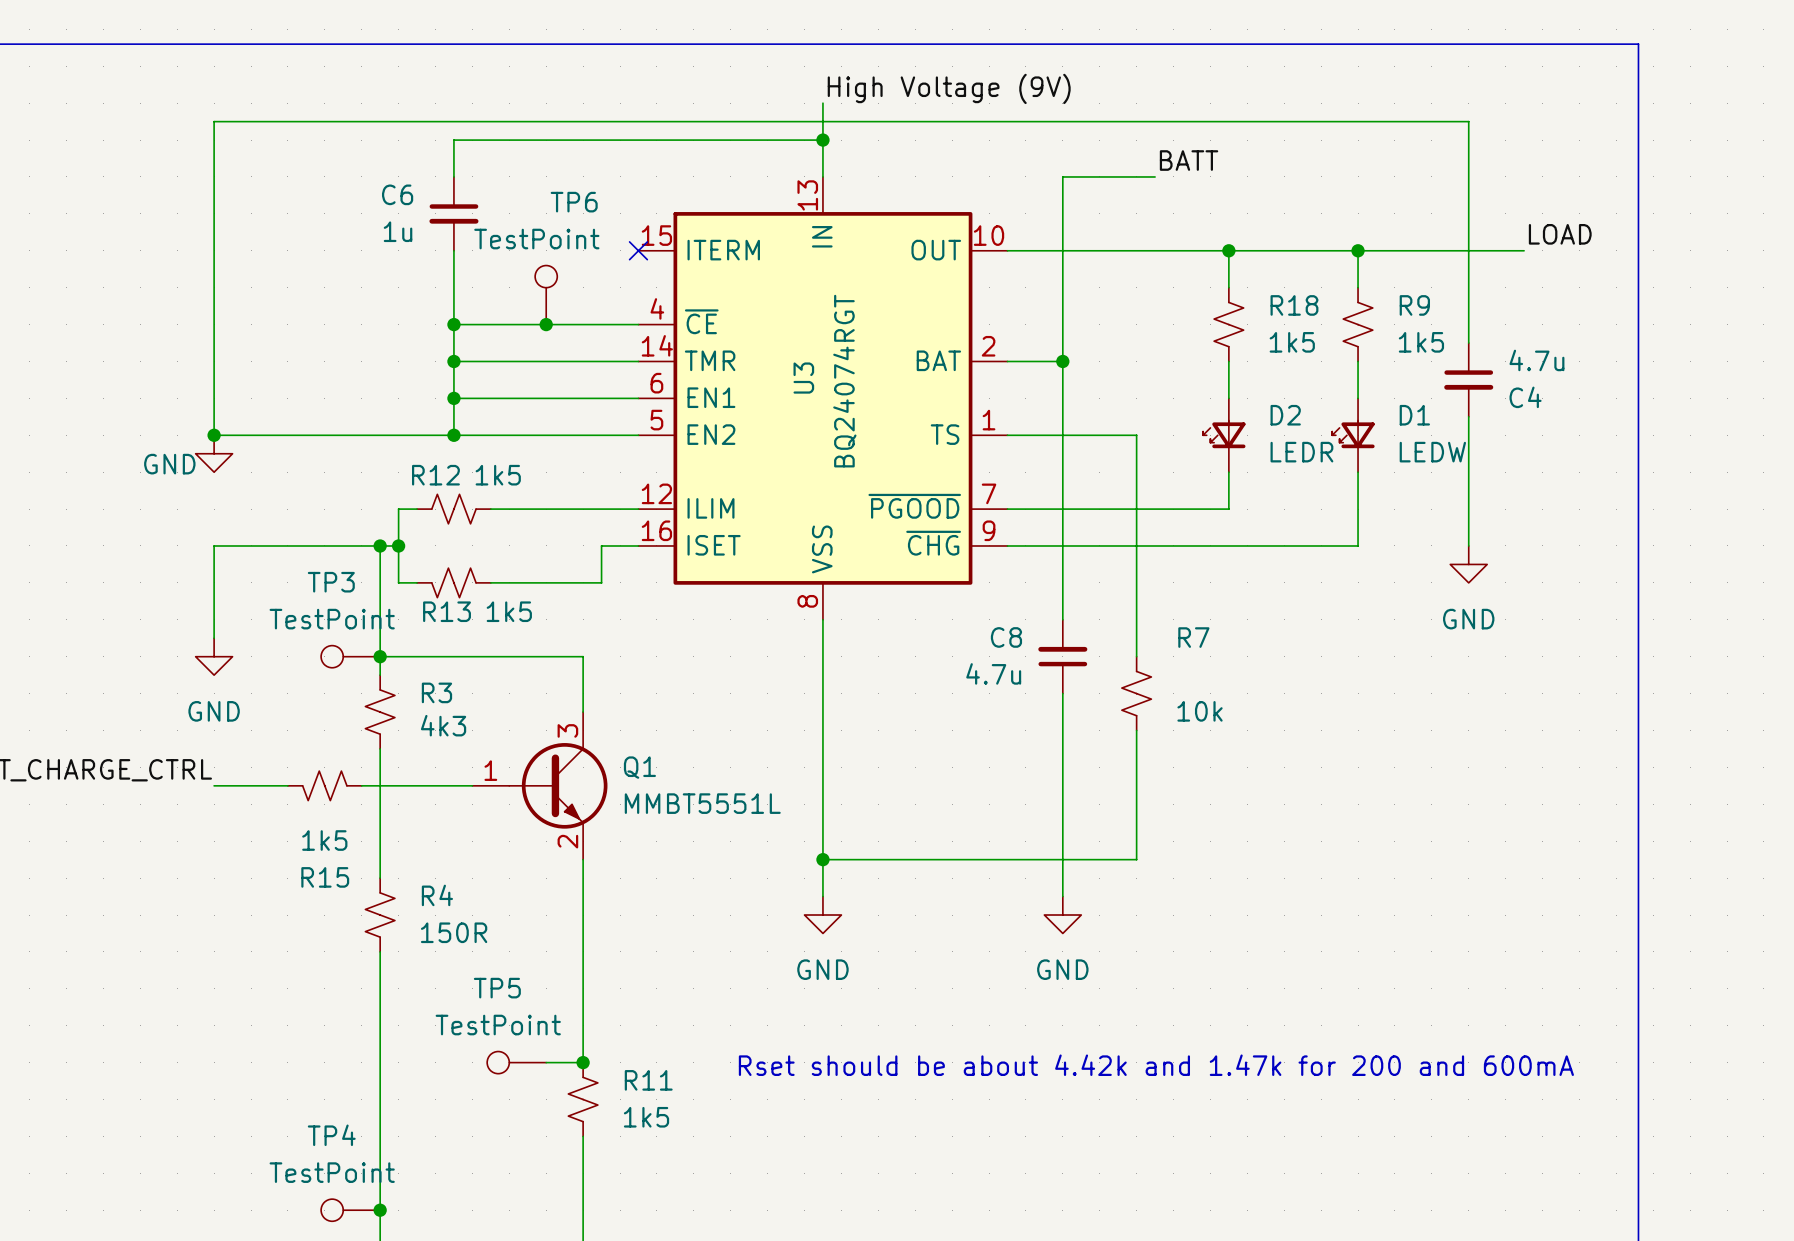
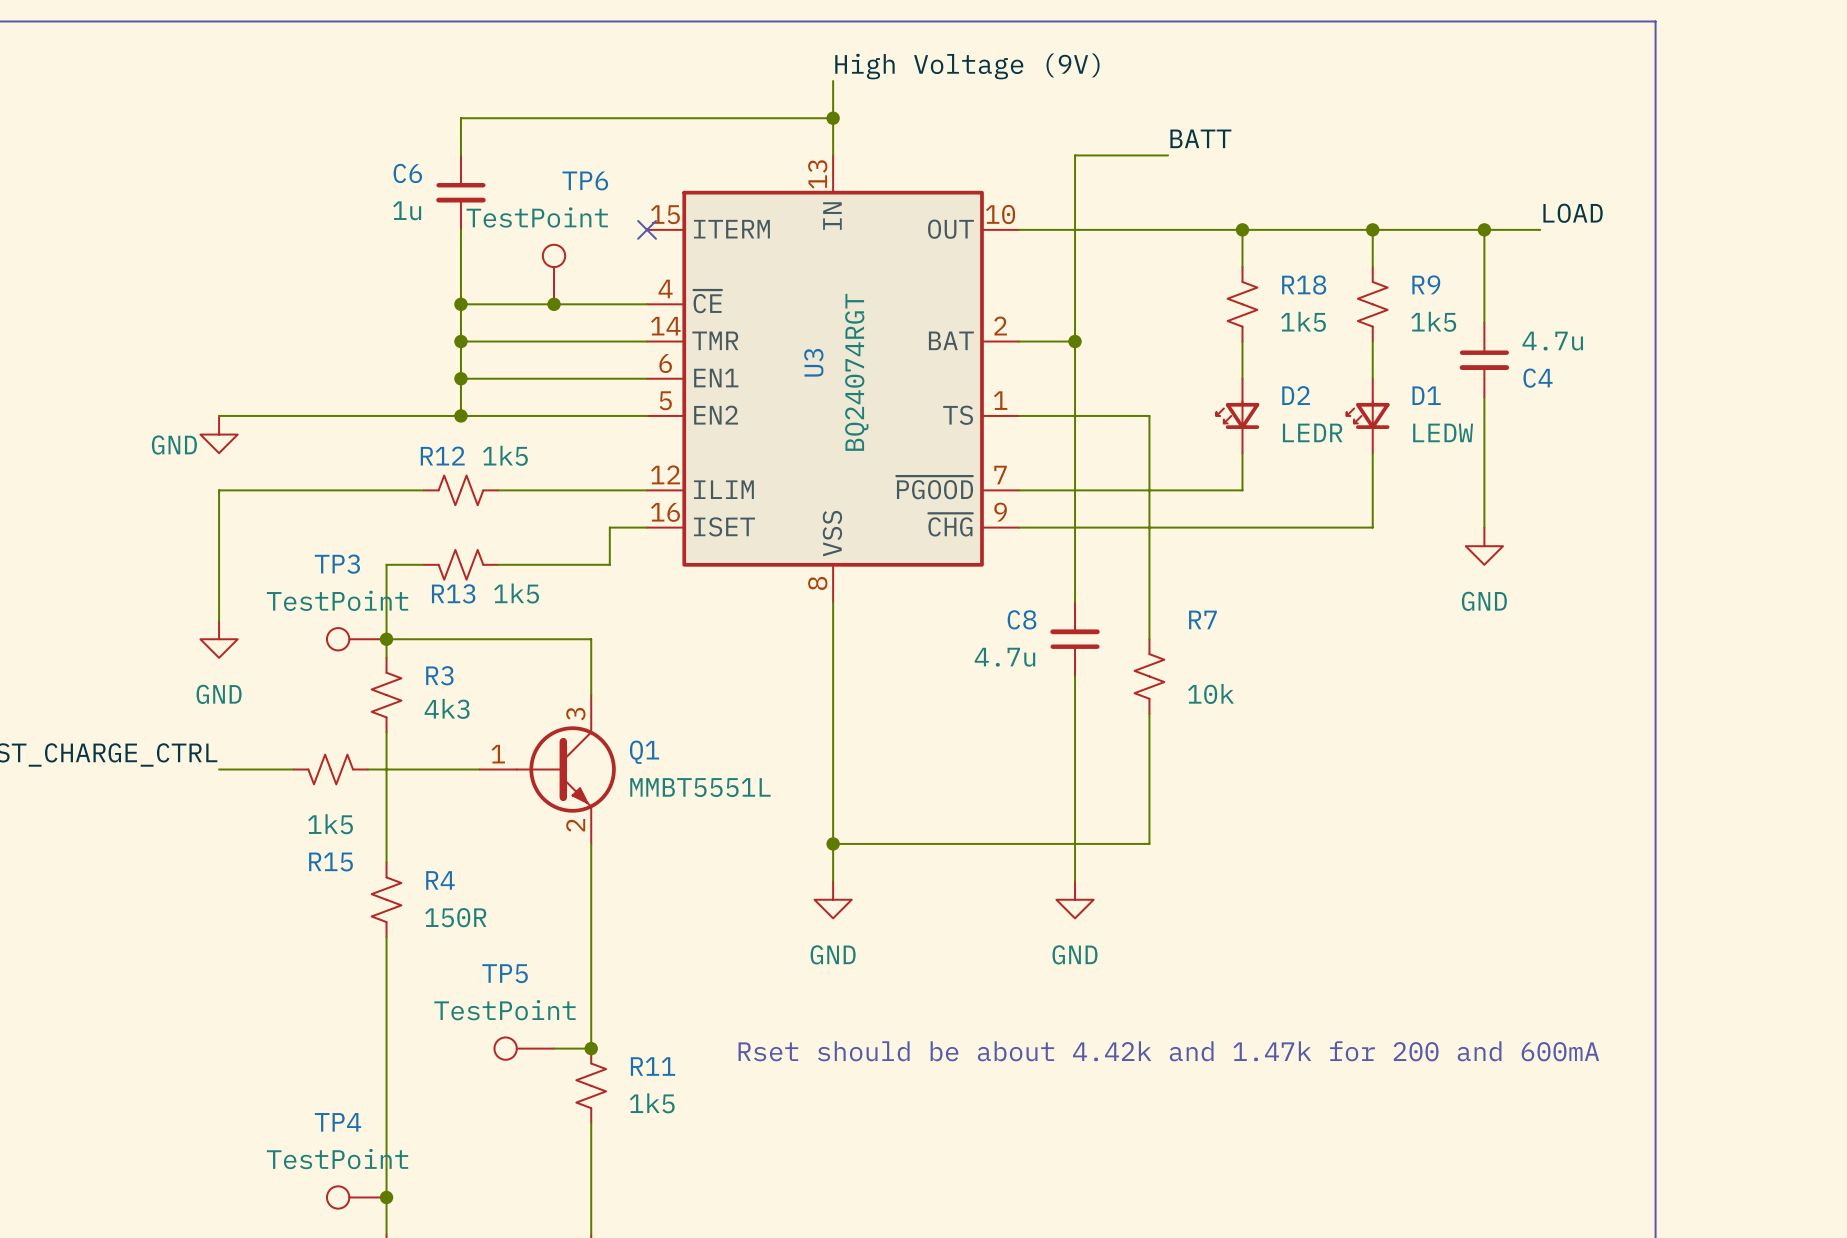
wire: (1468, 250) (1468, 121) (214, 121) (214, 435) -> none
junction: none -> (1484, 229)
junction: (214, 435) -> none
wire: (398, 509) (398, 582) -> none
wire: (214, 545) (398, 545) -> (219, 527) (219, 490) (405, 490)
wire: (380, 545) (380, 582) -> (405, 564) (386, 564)
junction: (380, 545) -> none
junction: (398, 545) -> none

